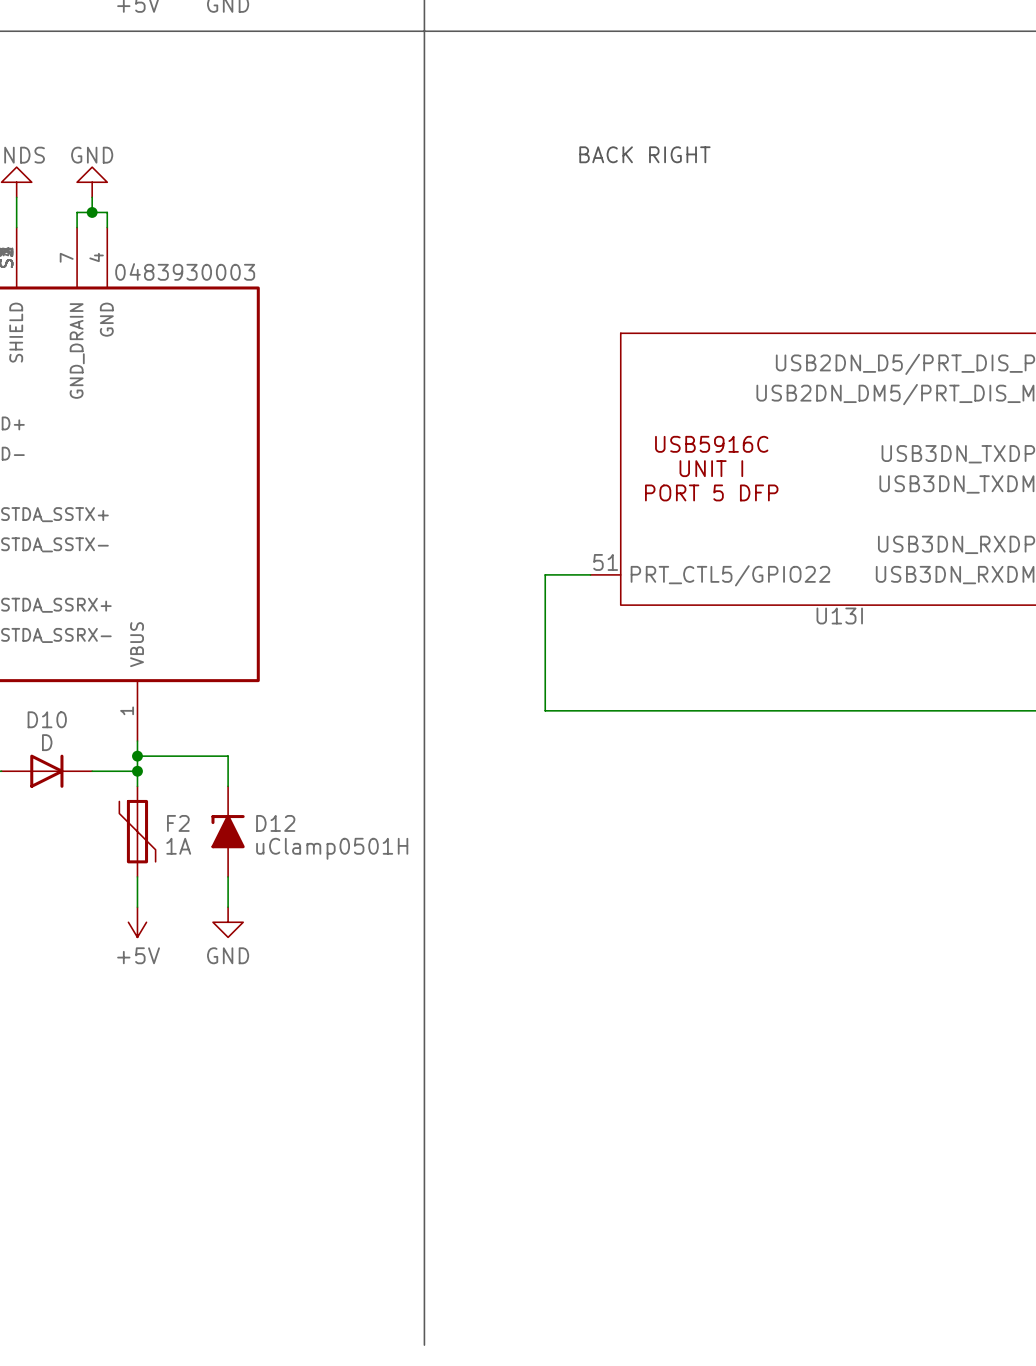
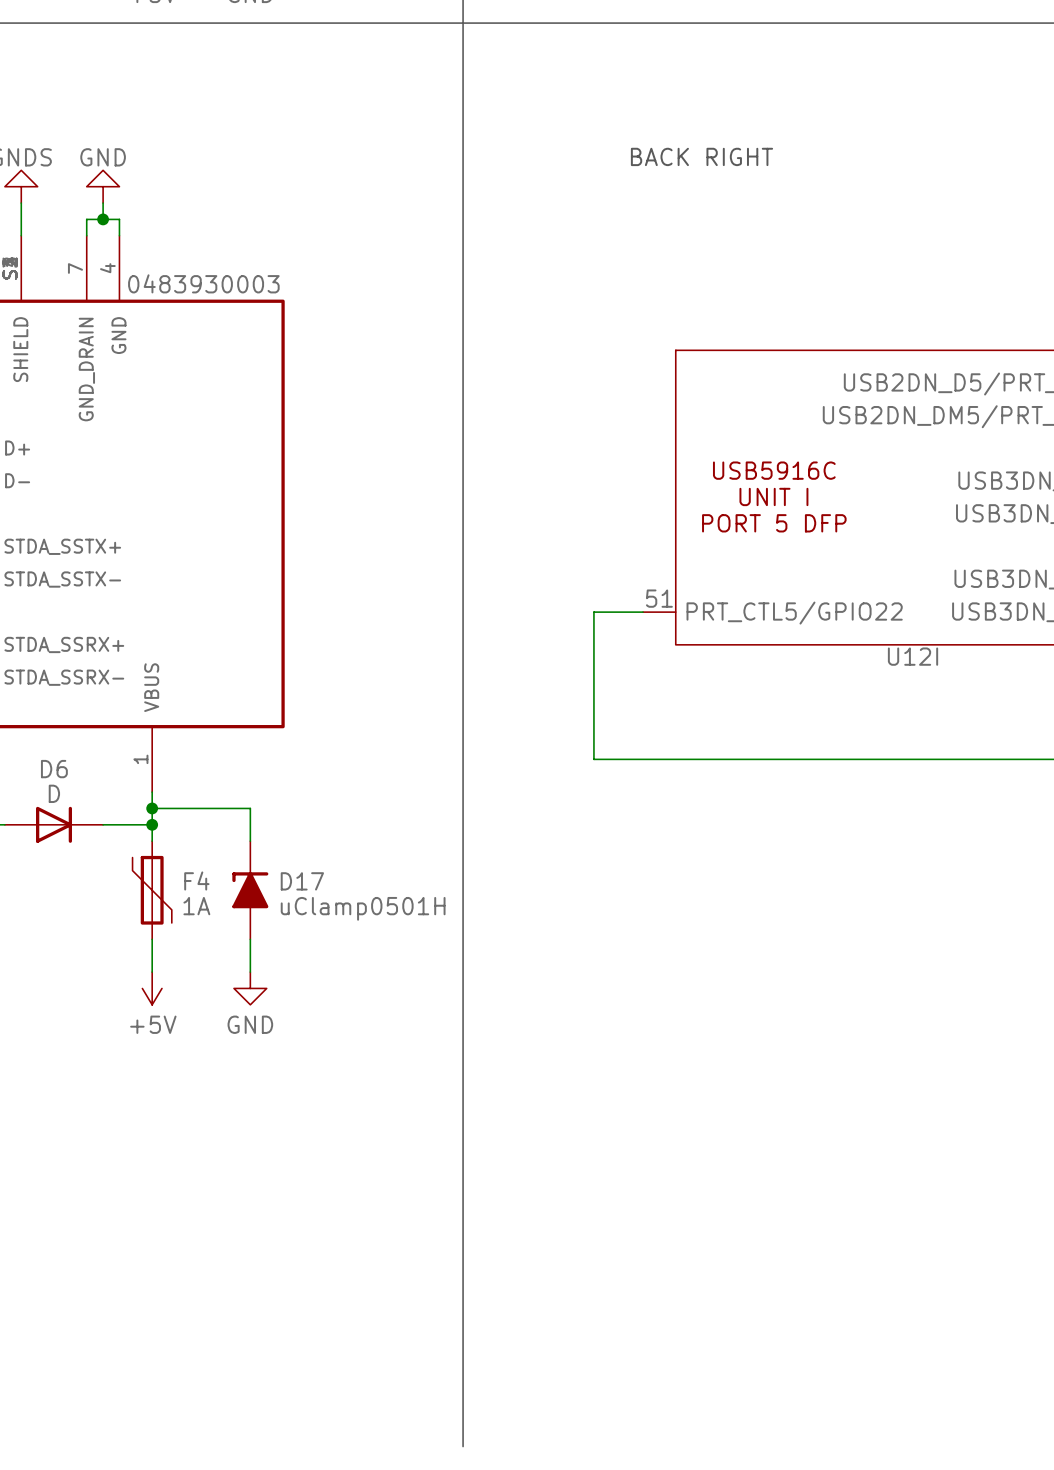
U13I name: U13I (839, 615) -> U12I (913, 656)
D10 name: D10 (47, 719) -> D6 (54, 769)
F2 name: F2 (178, 823) -> F4 (196, 880)
D12 name: D12 (275, 823) -> D17 (302, 881)

